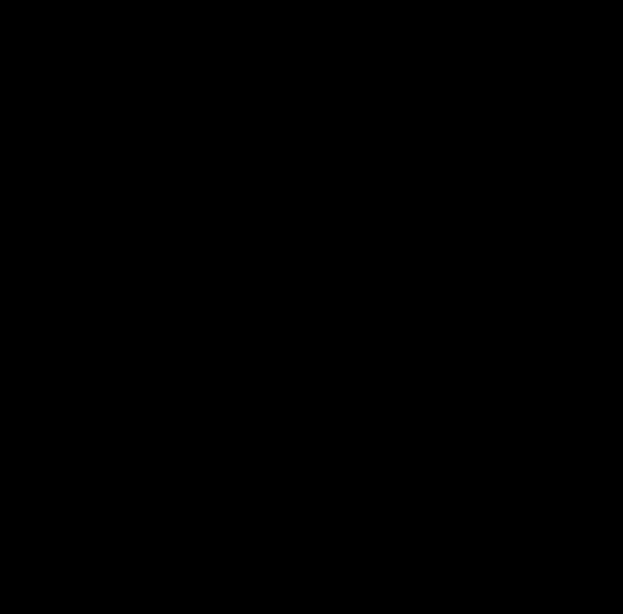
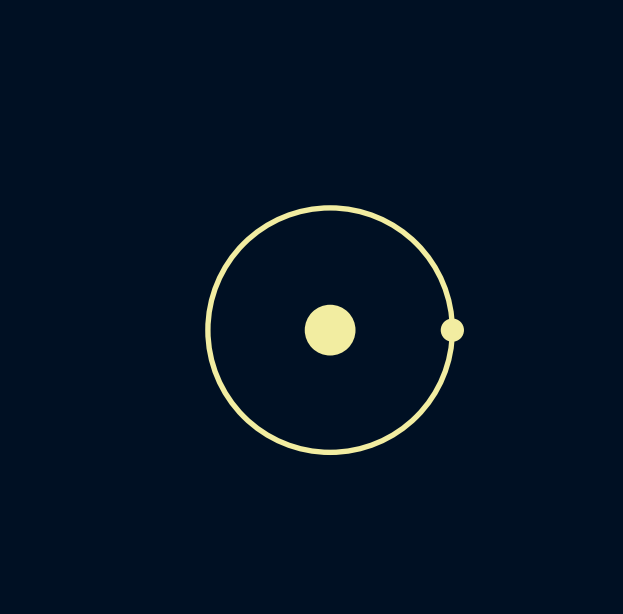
drawing: none -> [205, 205, 464, 456]

